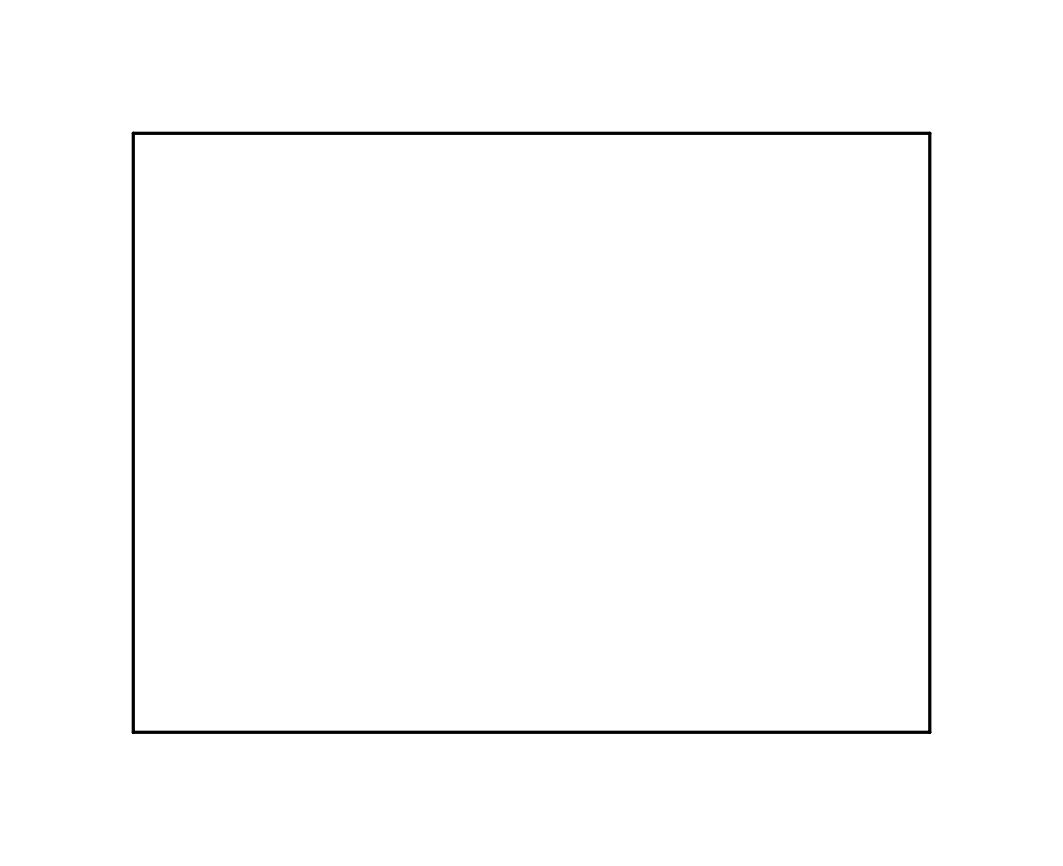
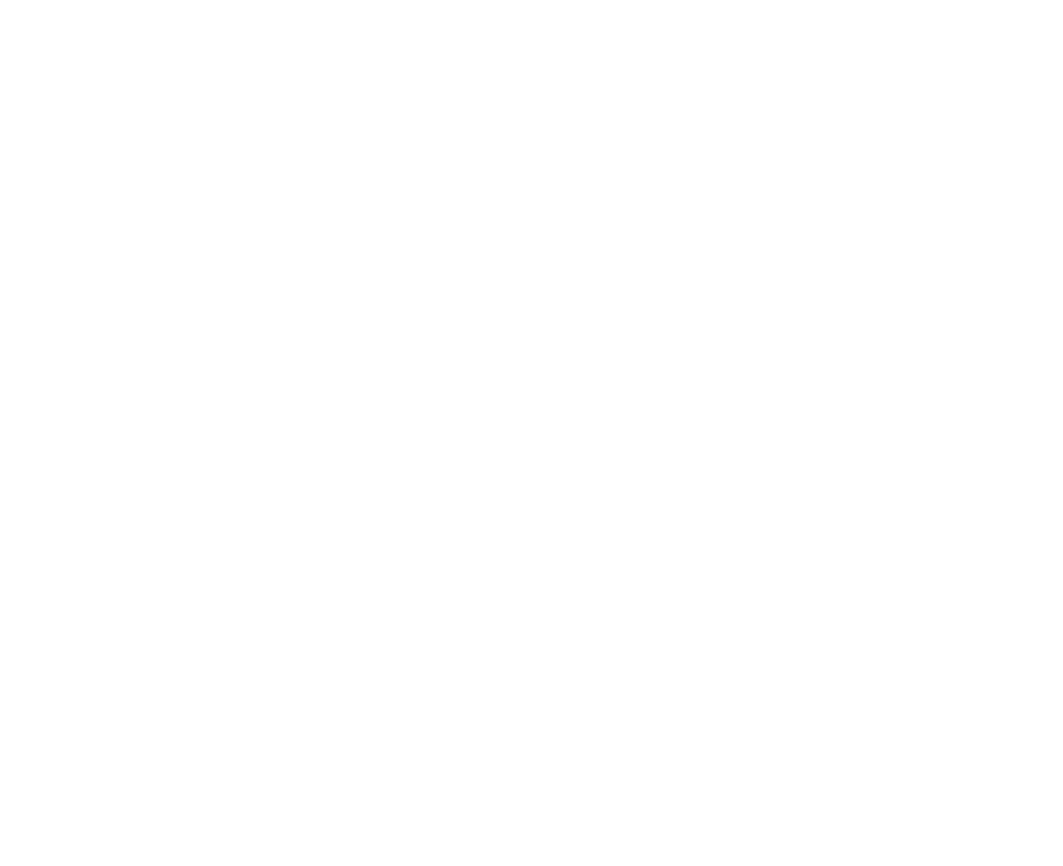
board edge: (929, 133) (133, 133) (133, 732) (929, 732) (929, 133) -> none

